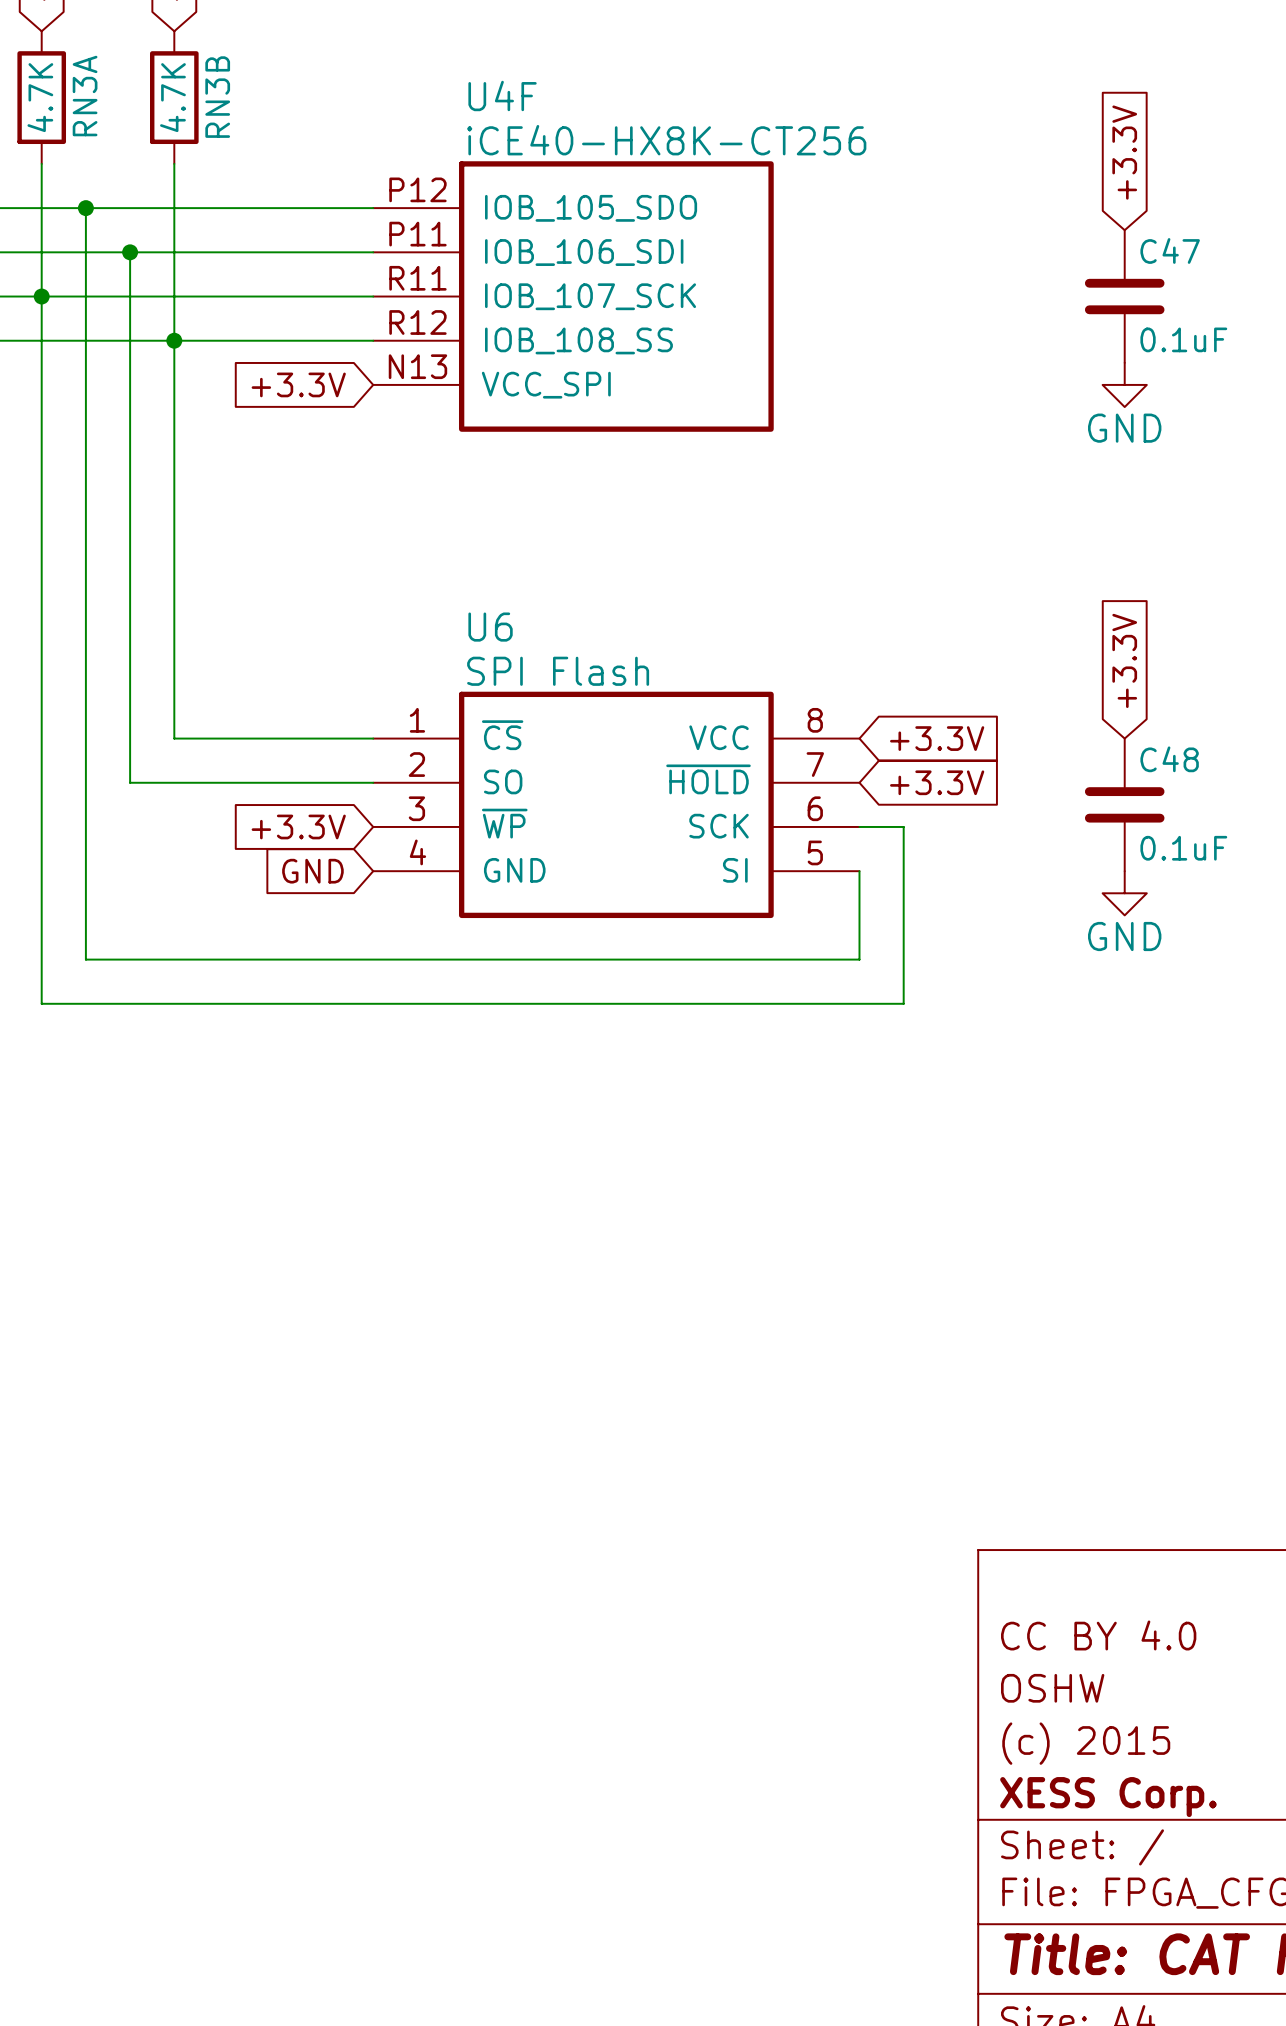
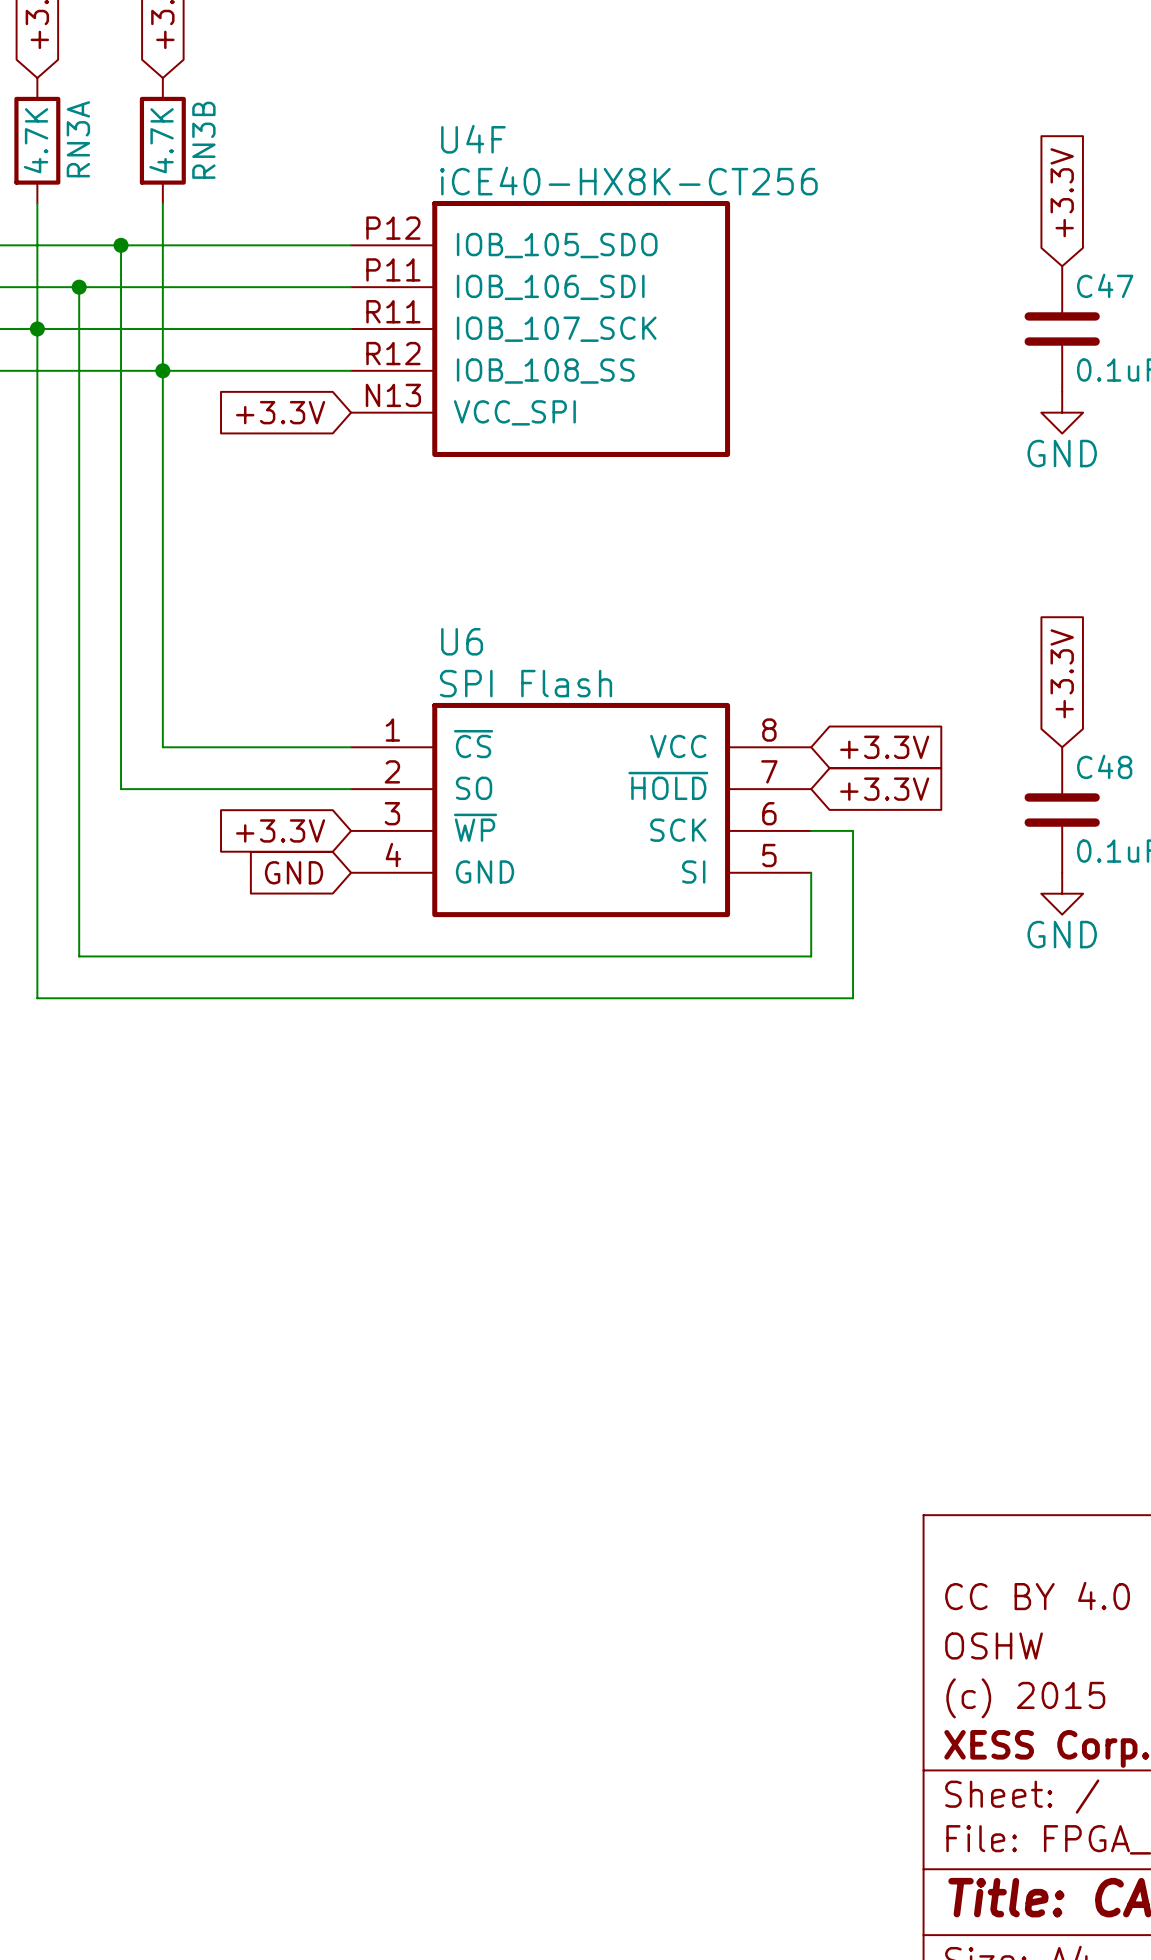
wire: (85, 208) (85, 252) -> (121, 245) (121, 287)
junction: (85, 208) -> none
junction: none -> (121, 245)
junction: none -> (79, 287)
junction: (130, 252) -> none

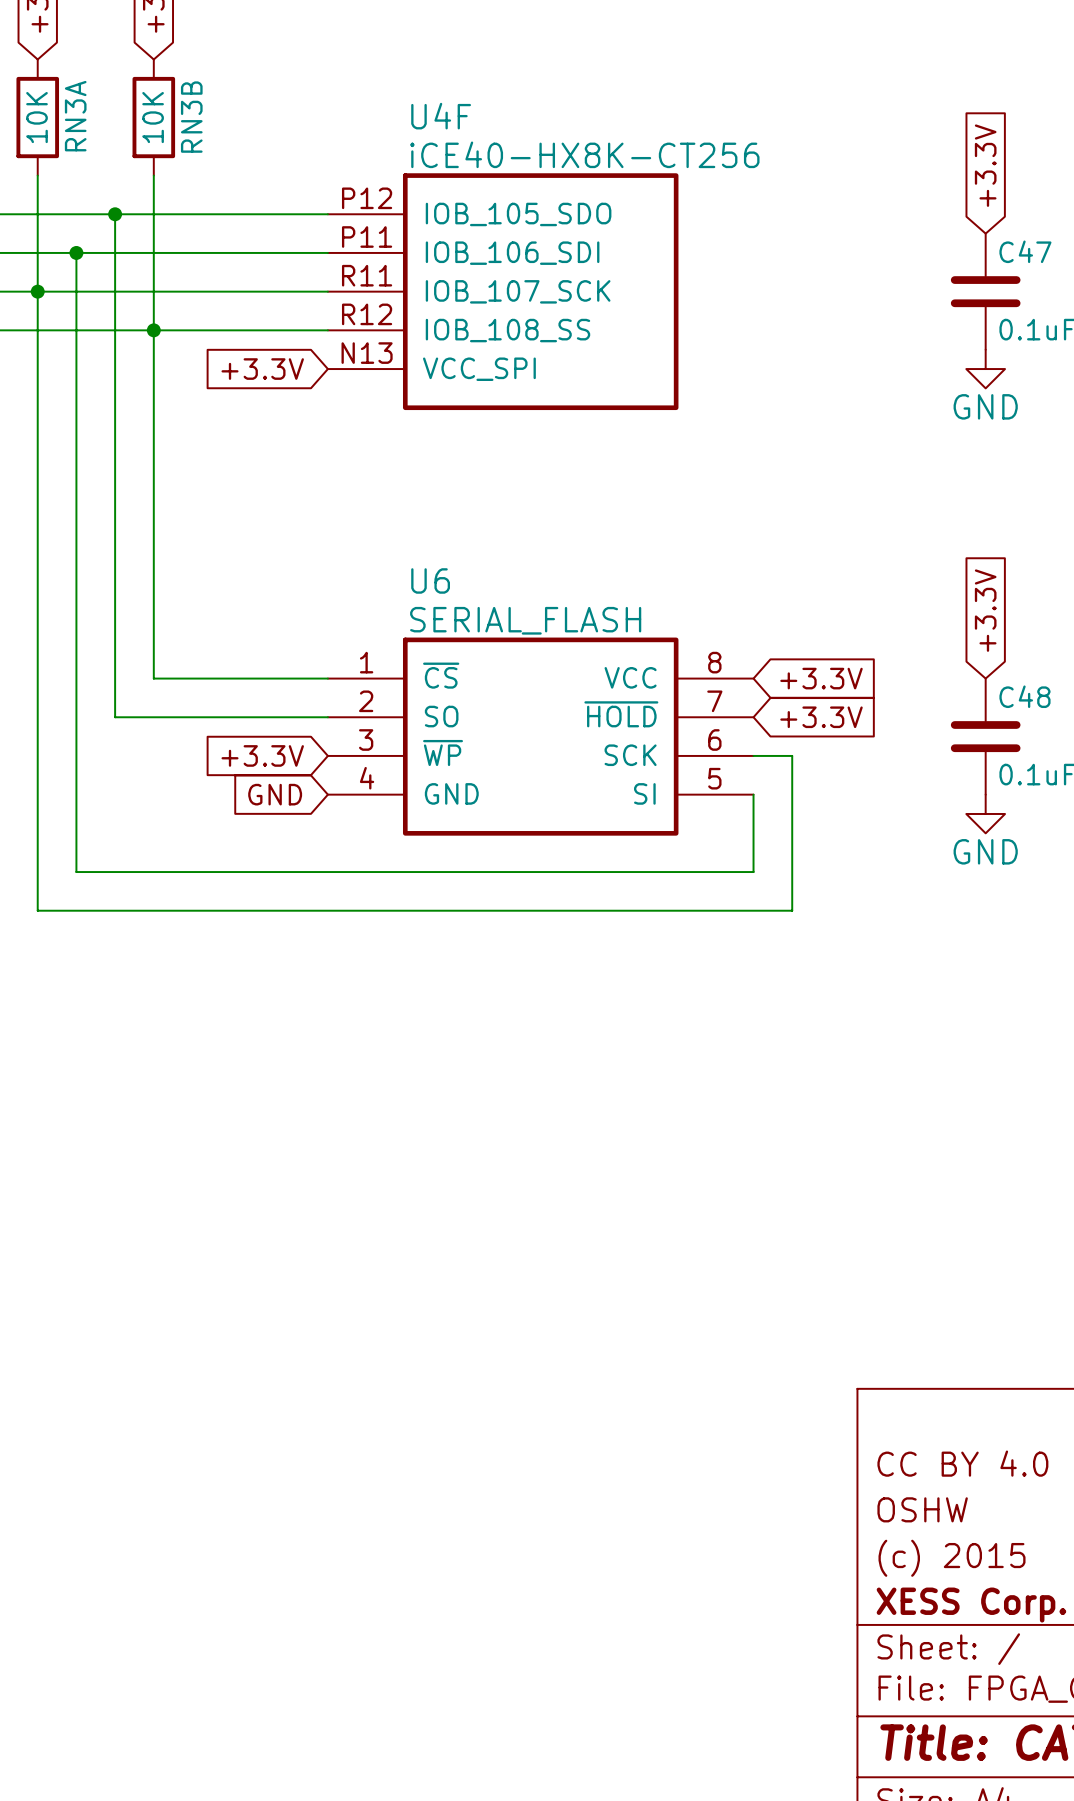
RN3A value: 4.7K (36, 140) -> 10K (37, 117)
RN3B value: 4.7K (161, 140) -> 10K (153, 117)
U6 value: SPI Flash (526, 683) -> SERIAL_FLASH (525, 620)

